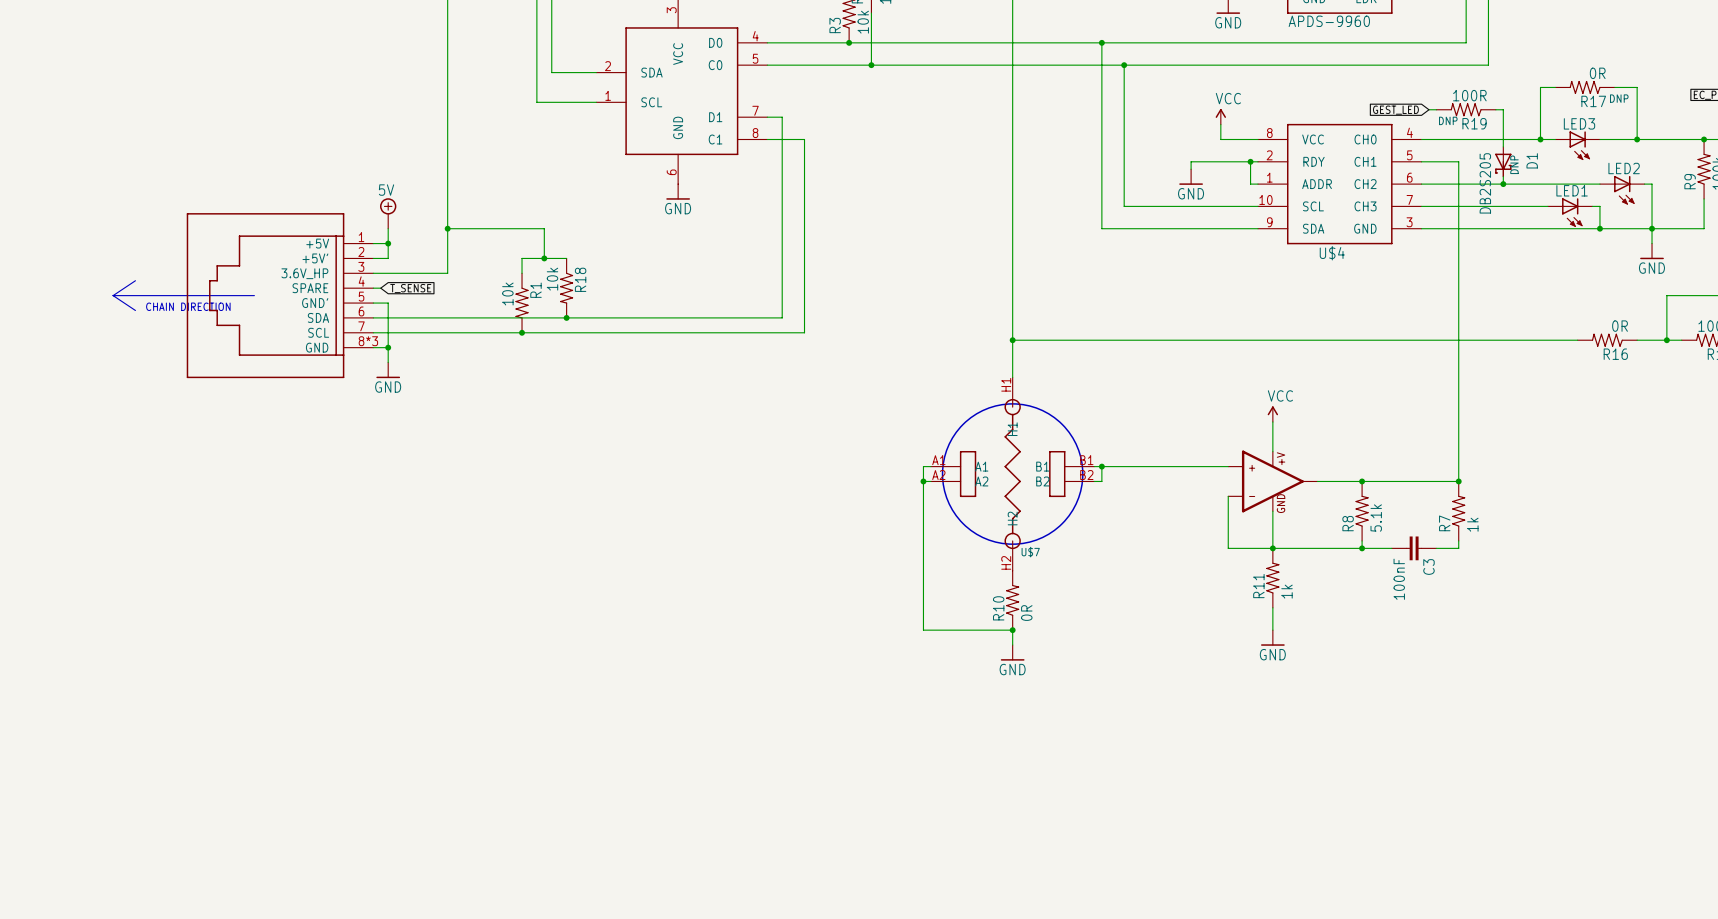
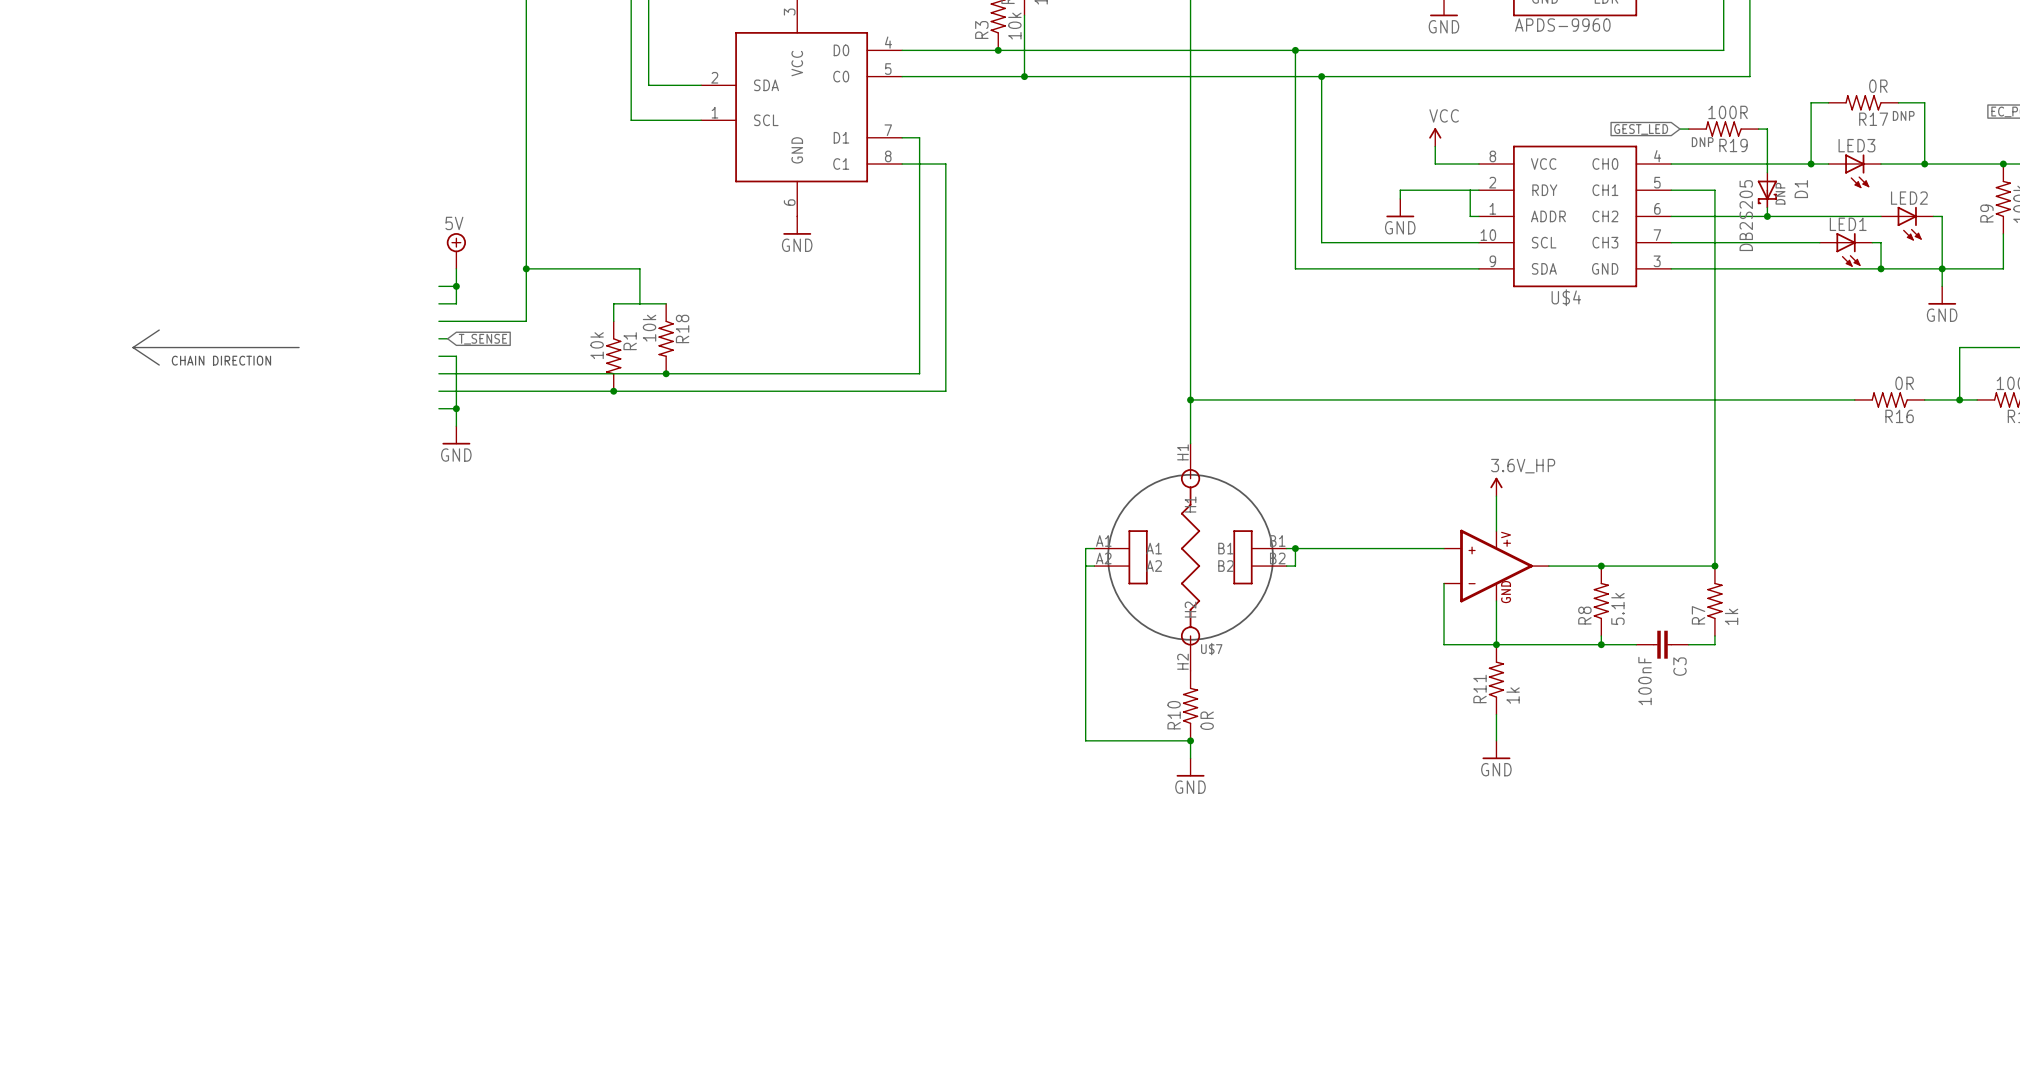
junction: (1250, 161) -> none
junction: (544, 258) -> none
part: (280, 295) -> none
power symbol: VCC (1272, 414) -> 3.6V_HP (1496, 486)
junction: (923, 481) -> none

